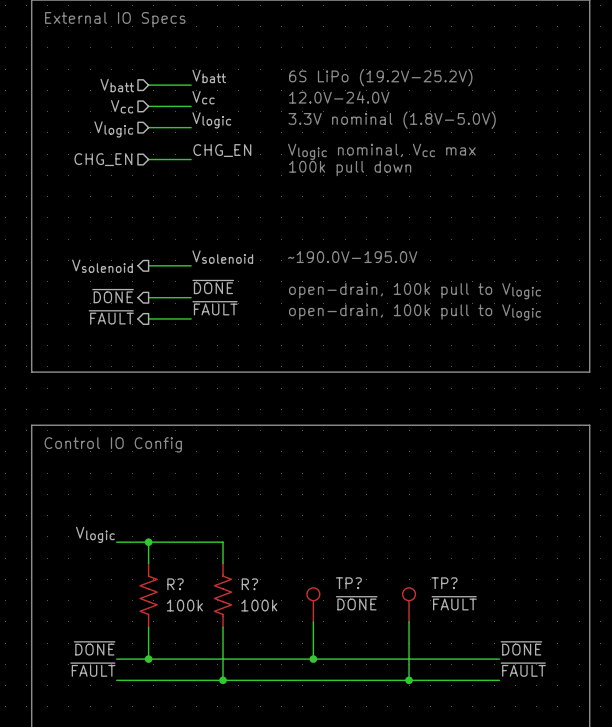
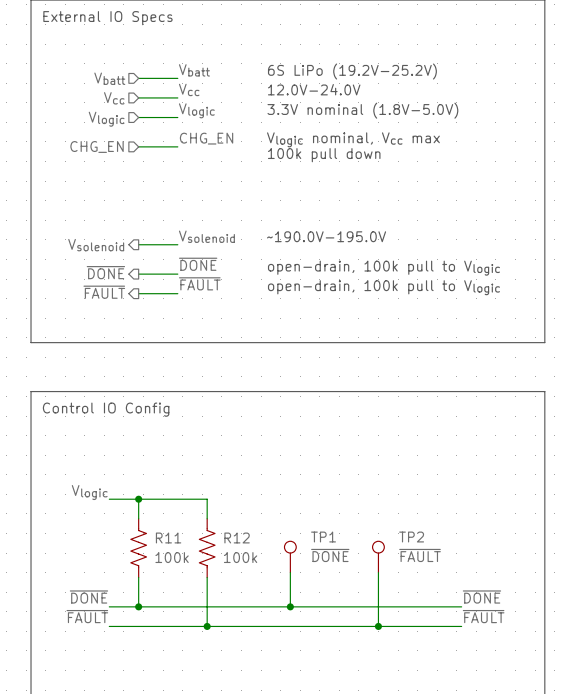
TP? name: TP? (348, 583) -> TP1 (323, 537)
TP? name: TP? (444, 583) -> TP2 (411, 537)
R? name: R? (175, 584) -> R11 (168, 537)
R? name: R? (249, 584) -> R12 (237, 537)

